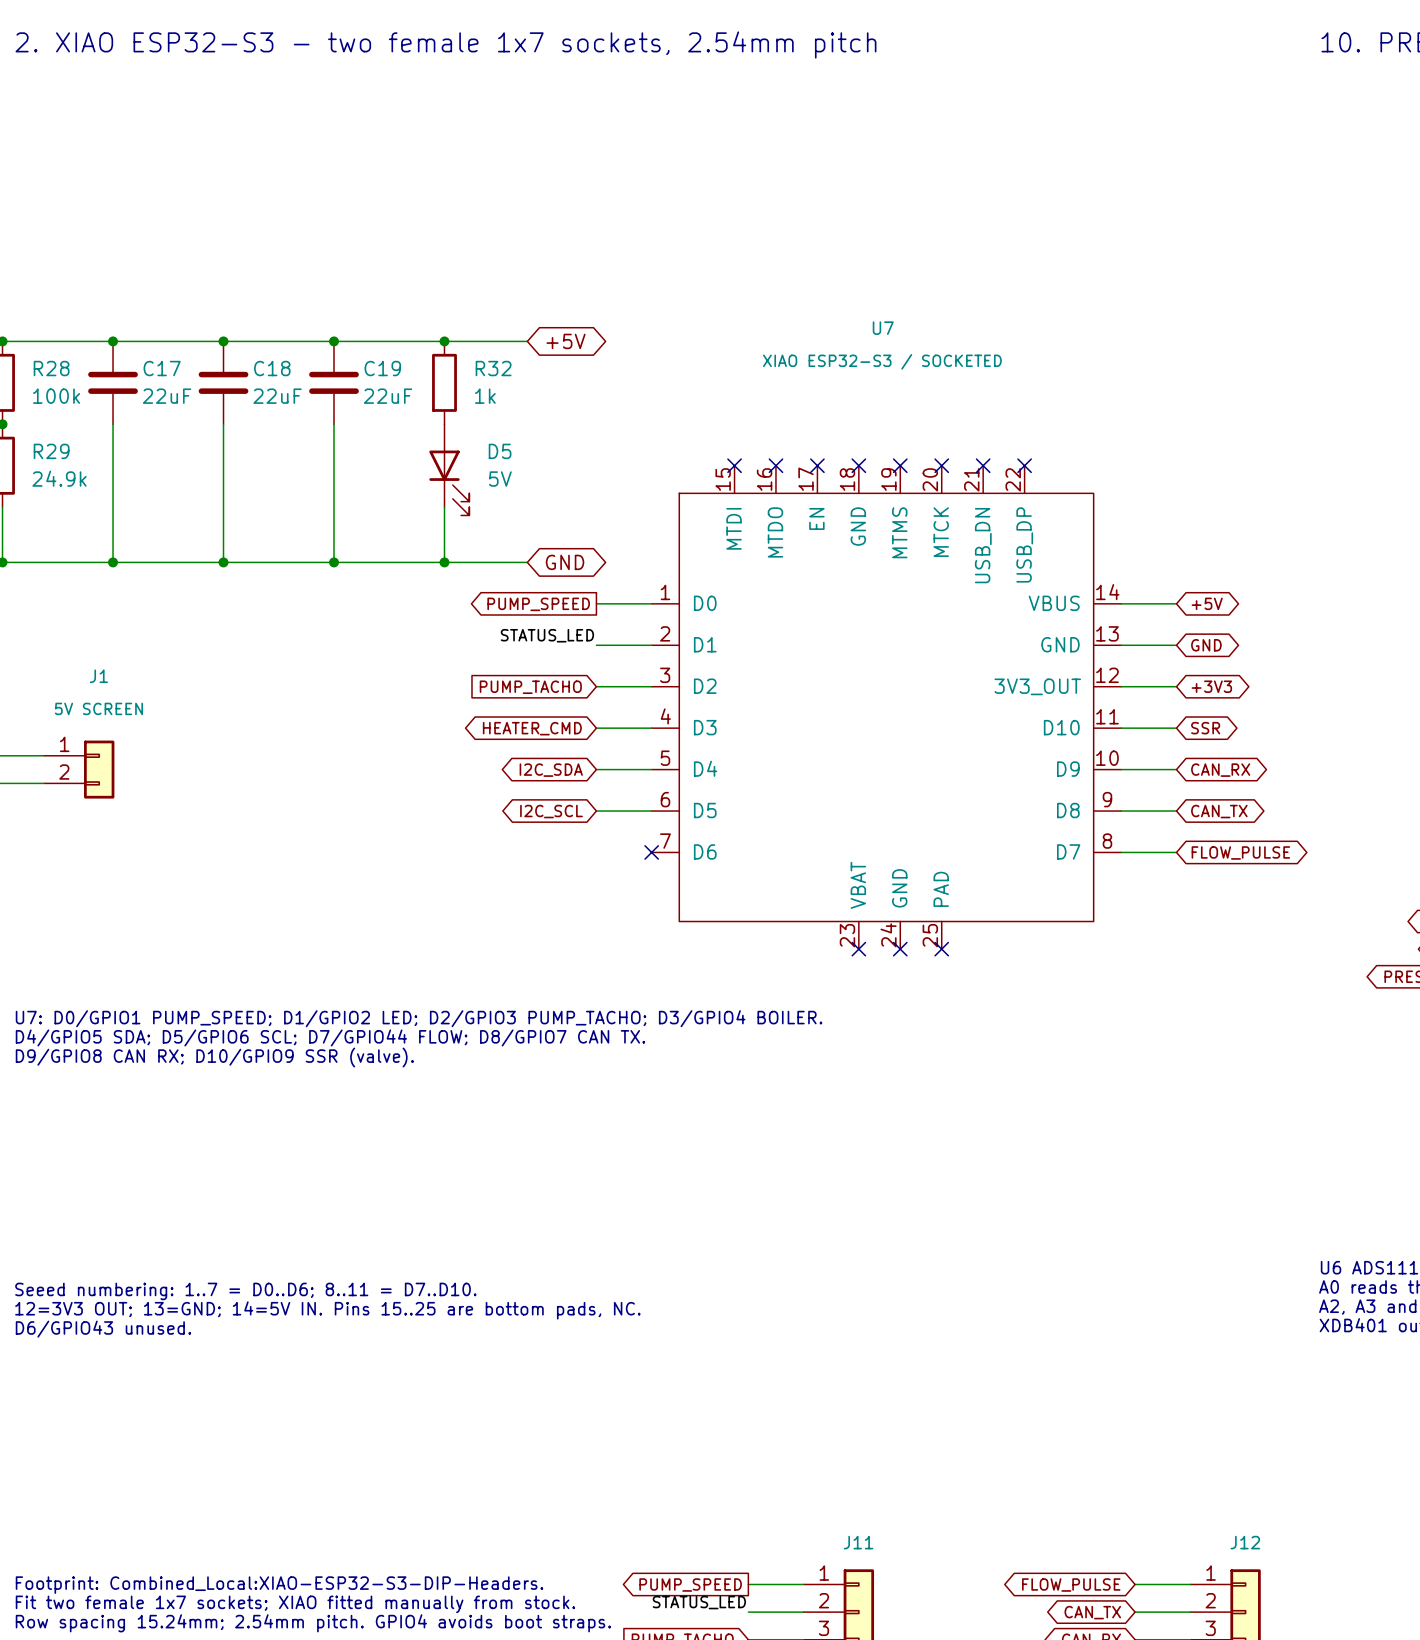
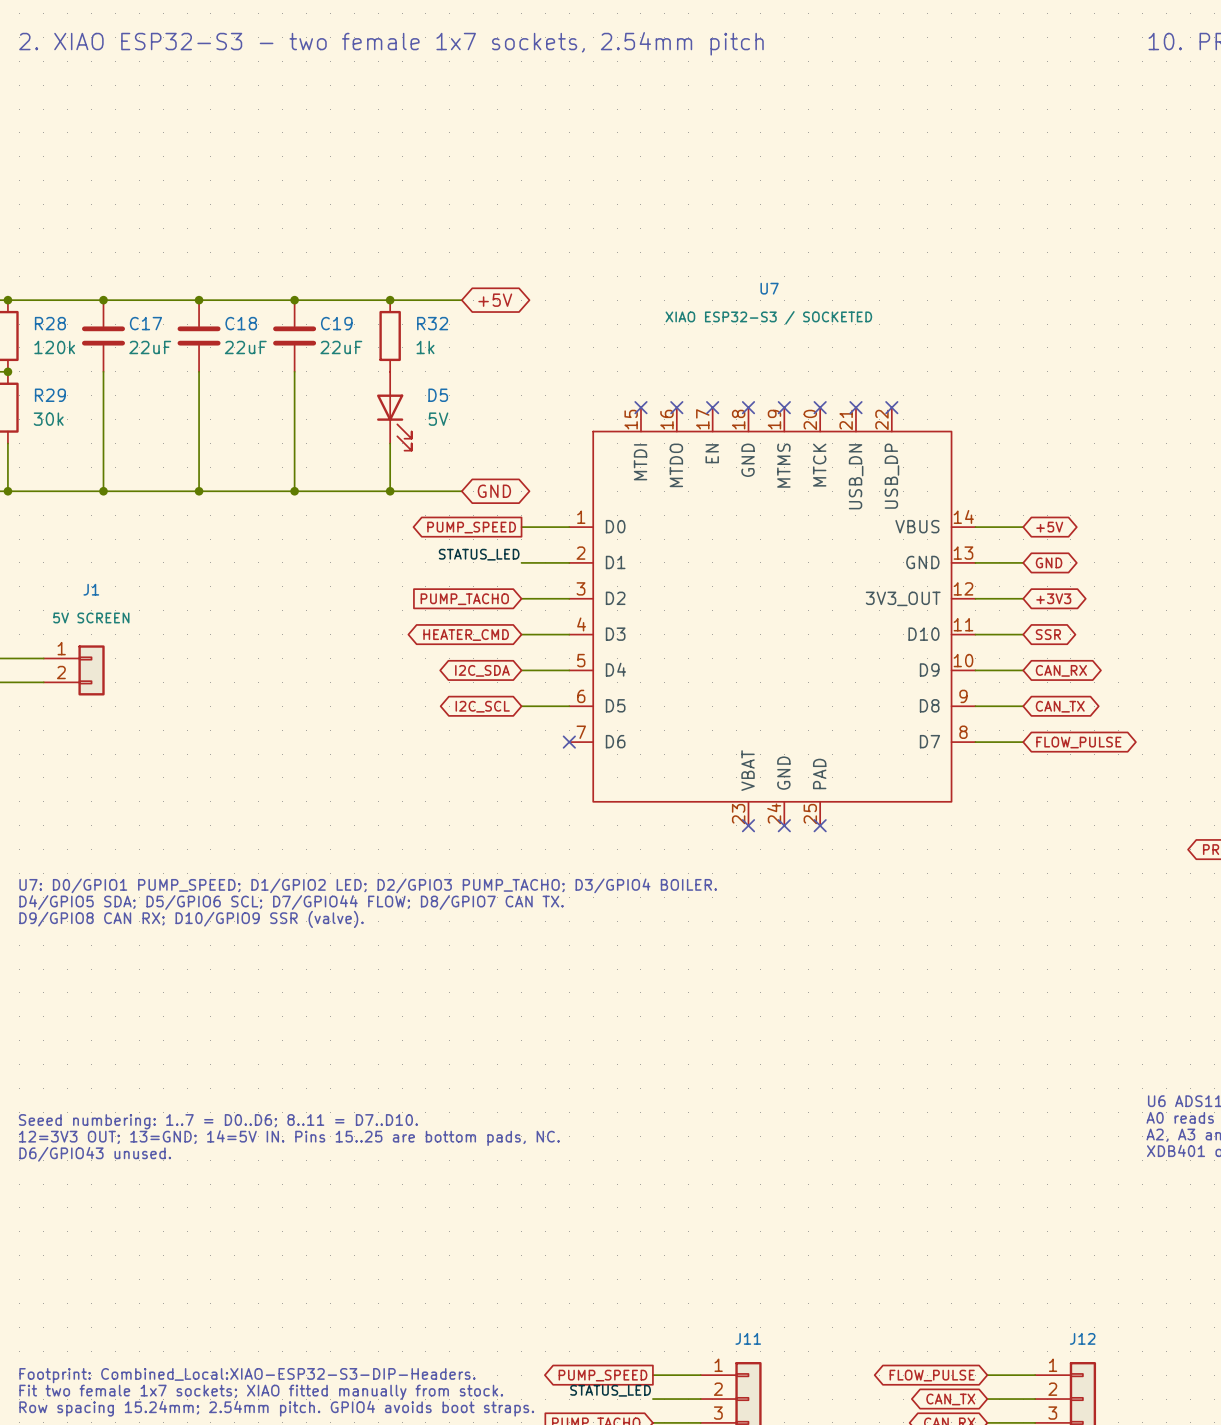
R28 value: 100k (56, 396) -> 120k (54, 347)
R29 value: 24.9k (59, 478) -> 30k (48, 419)

